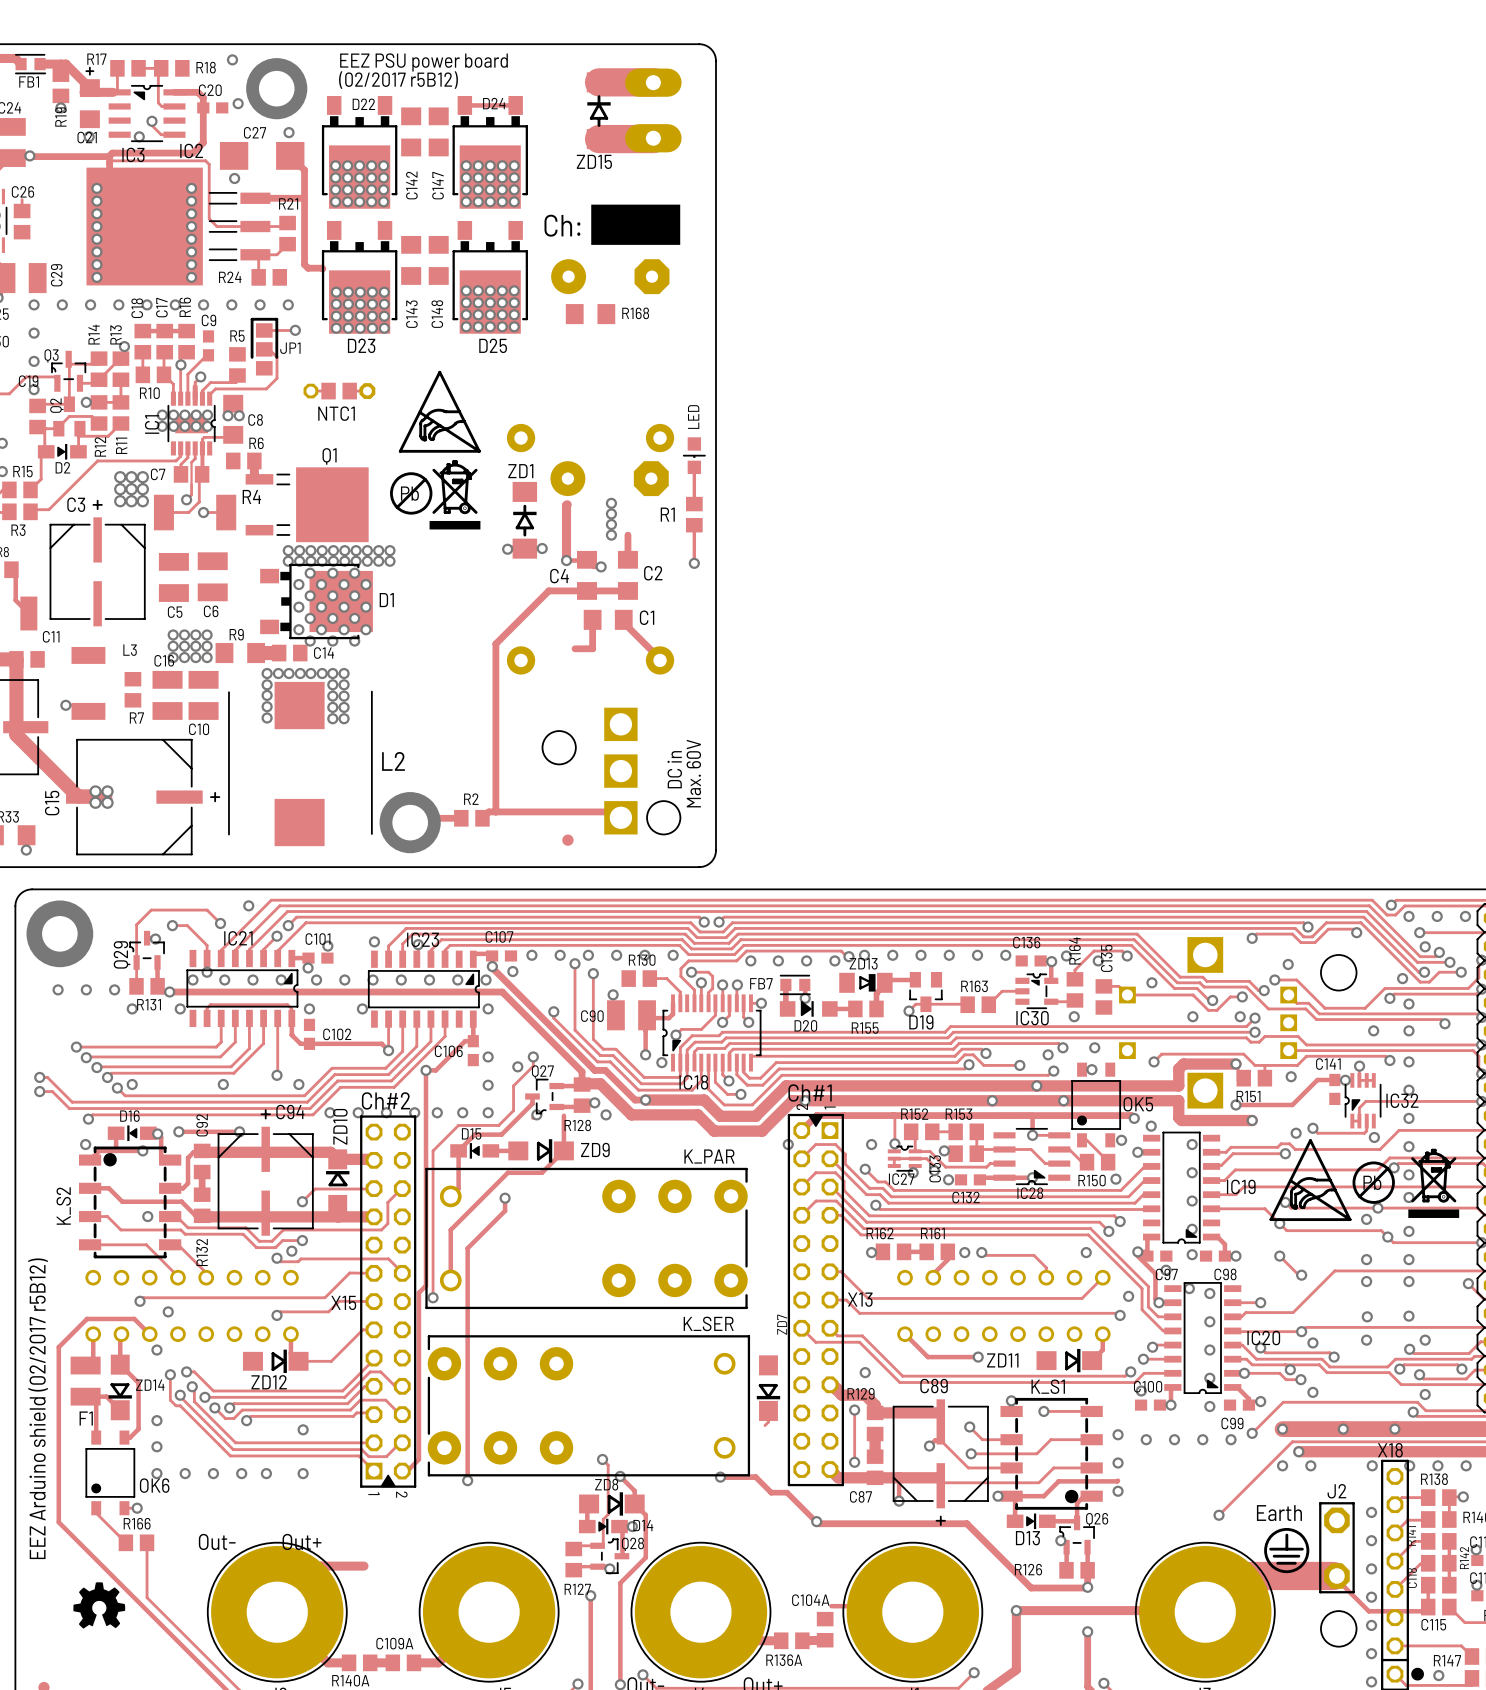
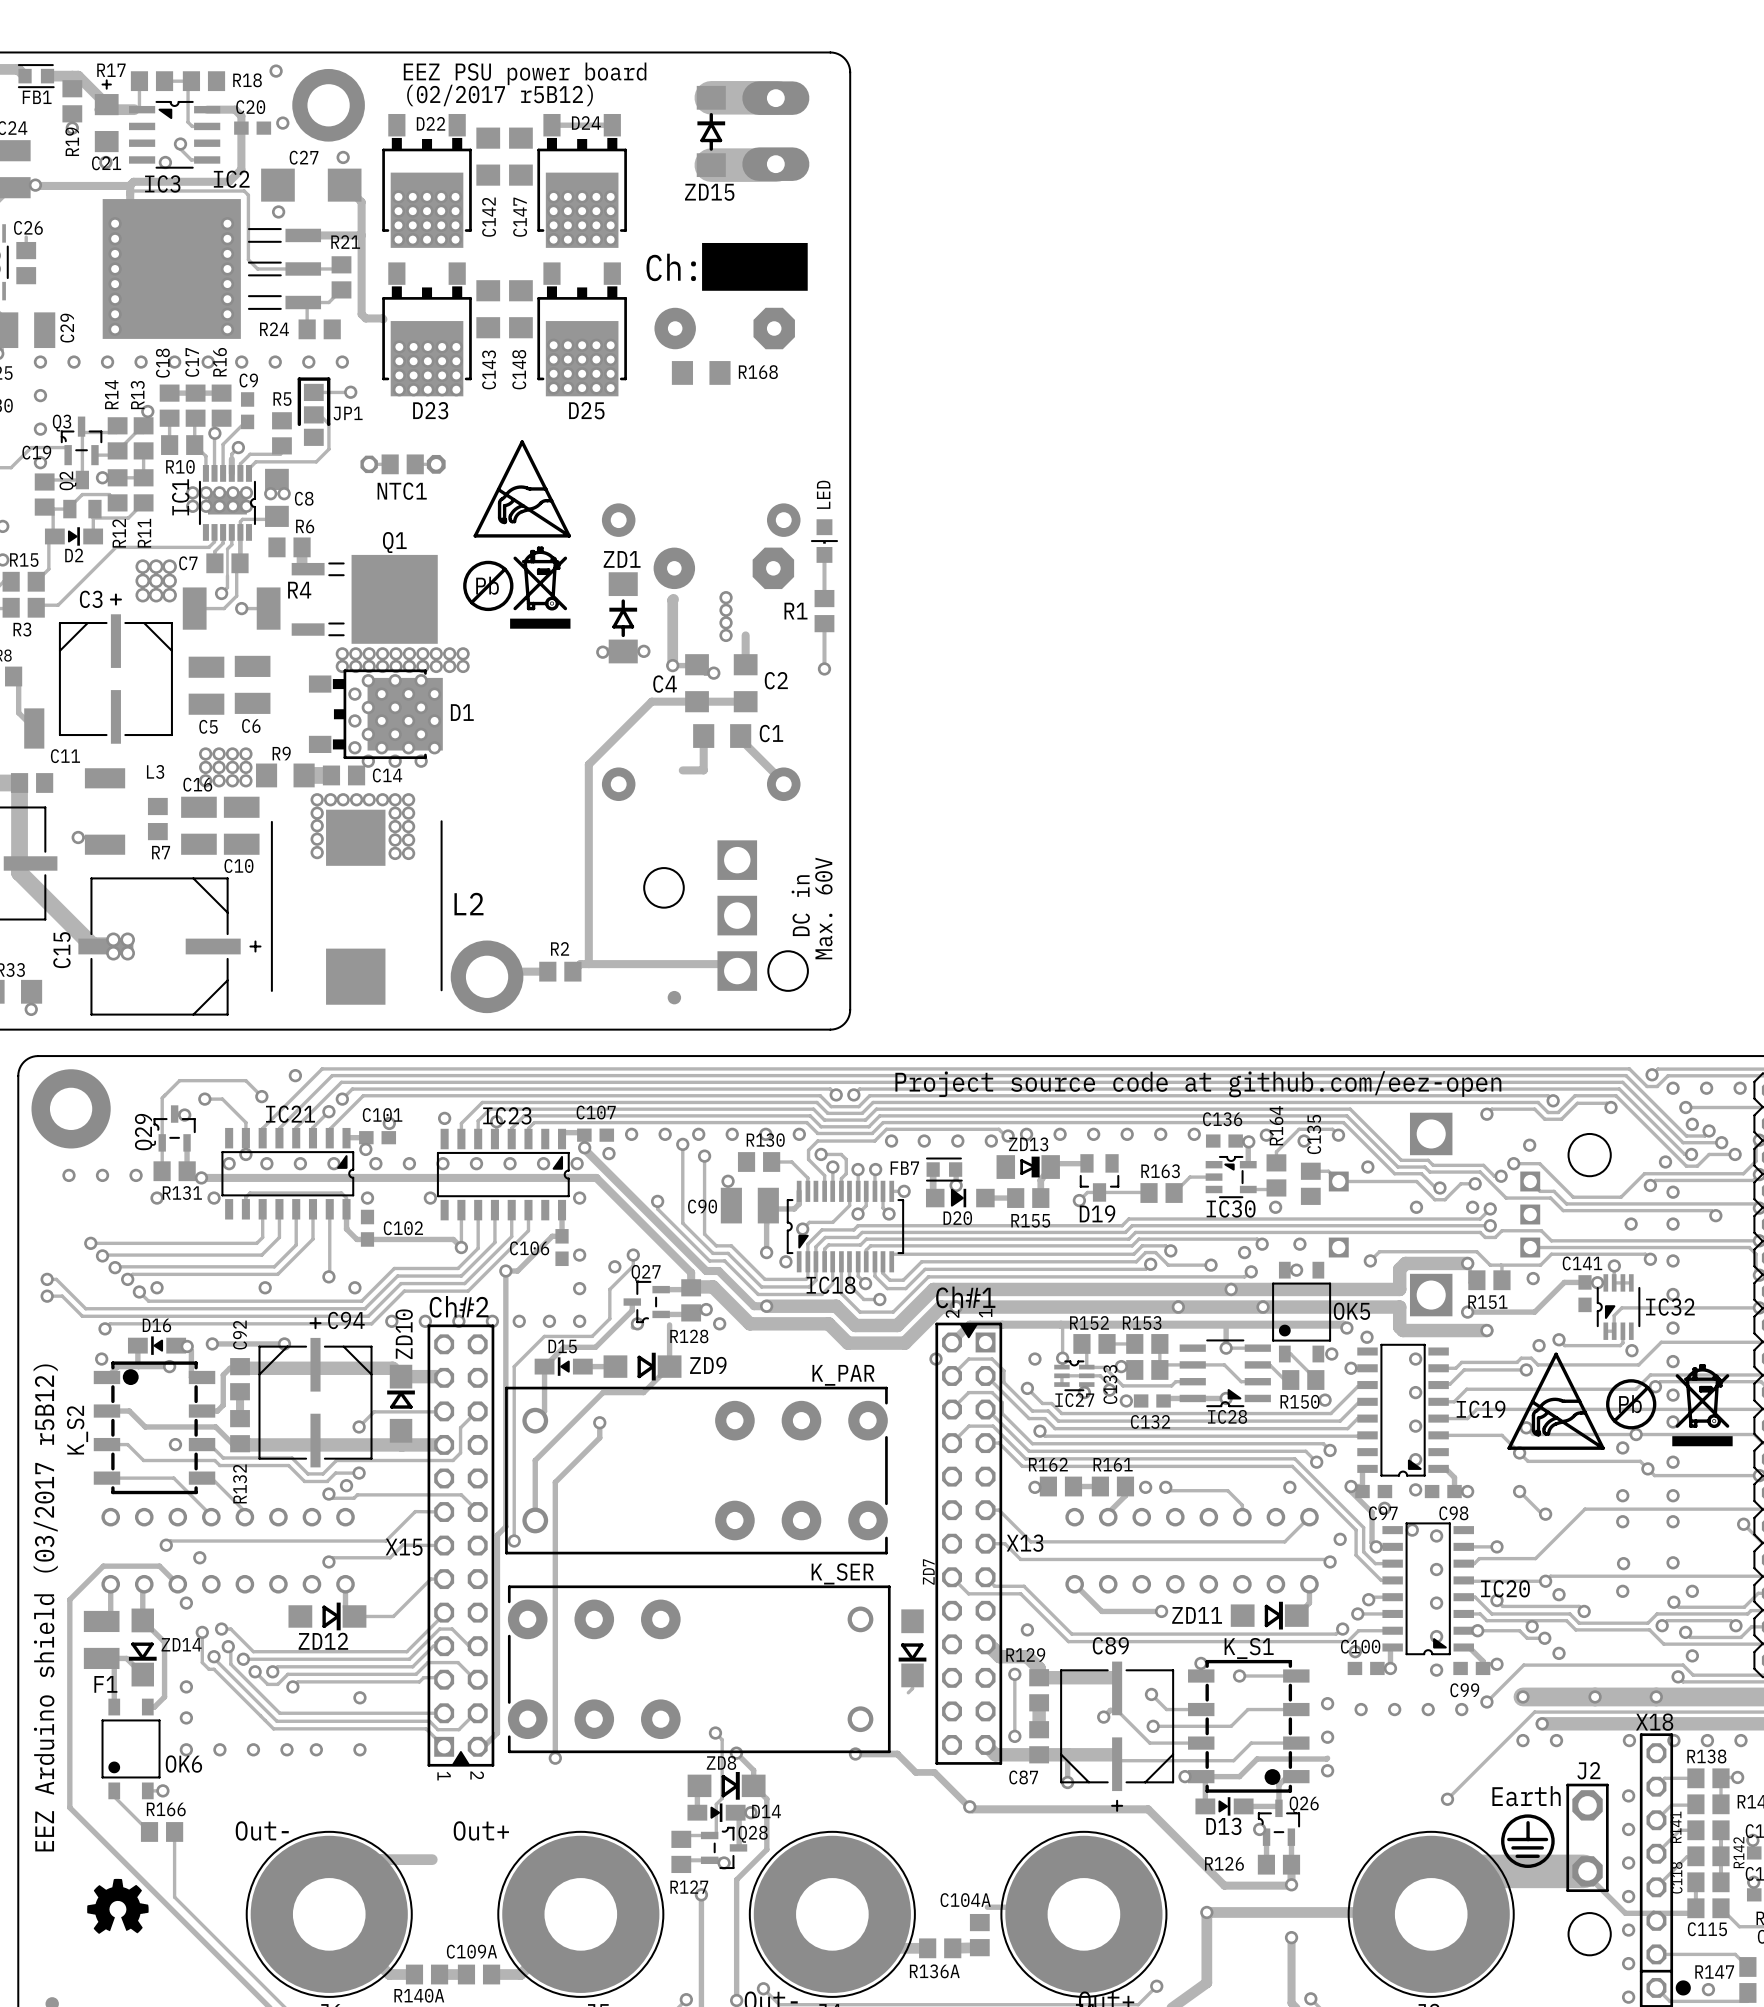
text: none -> Project source code at github.com/eez-open (1198, 1084)
text: EEZ Arduino shield (02/2017 r5B12) (38, 1408) -> EEZ Arduino shield (03/2017 r5B12) (45, 1607)

